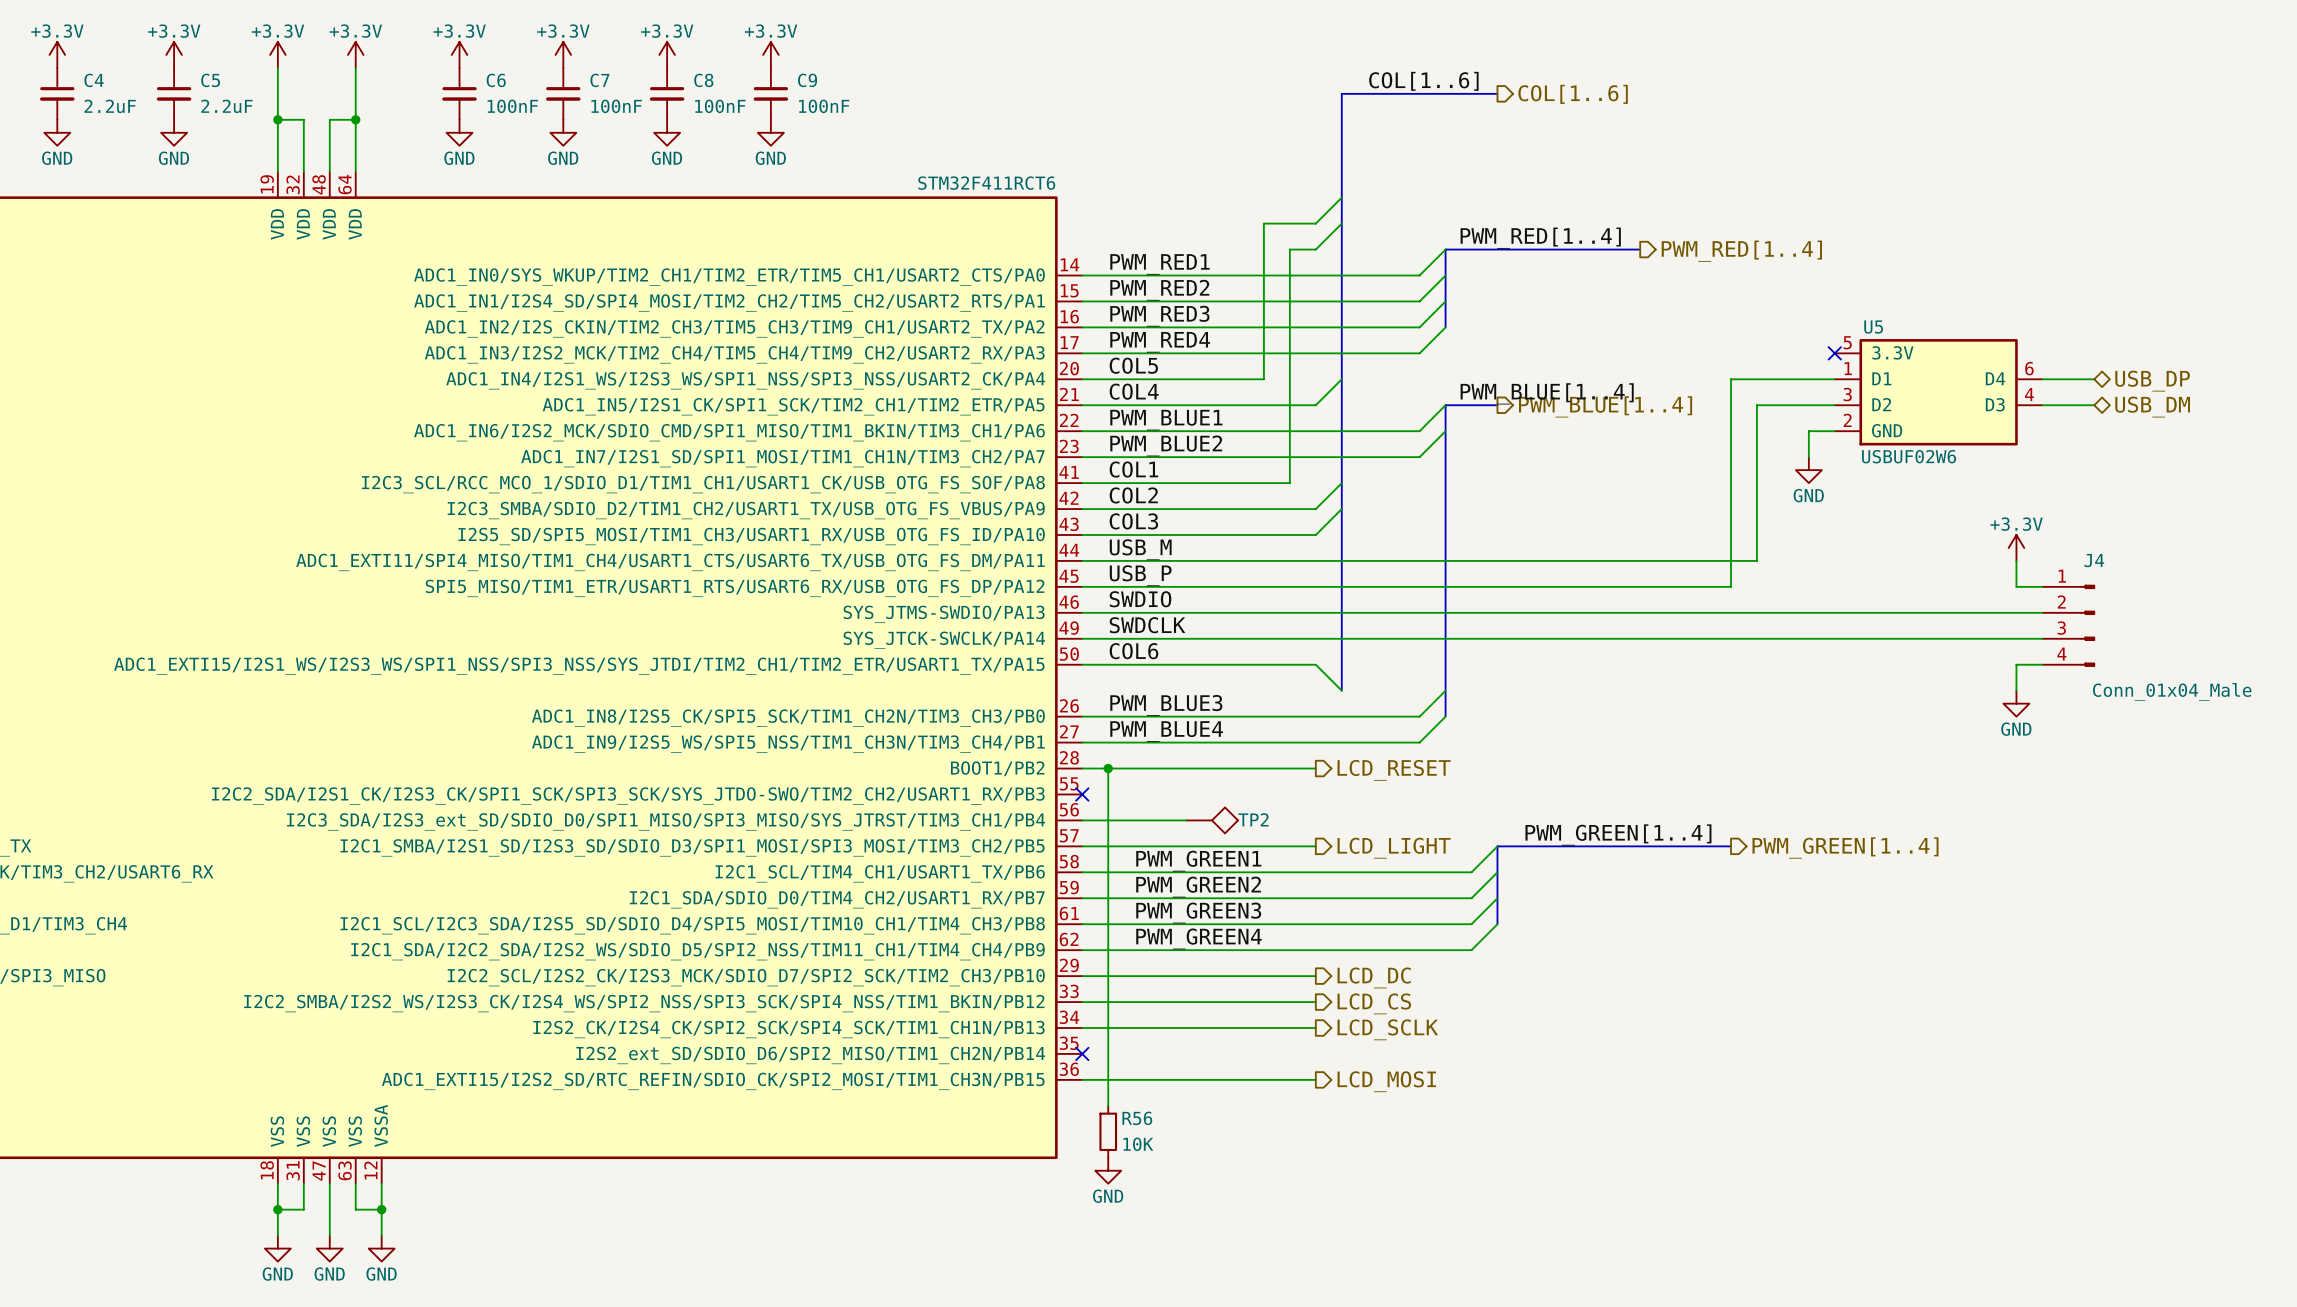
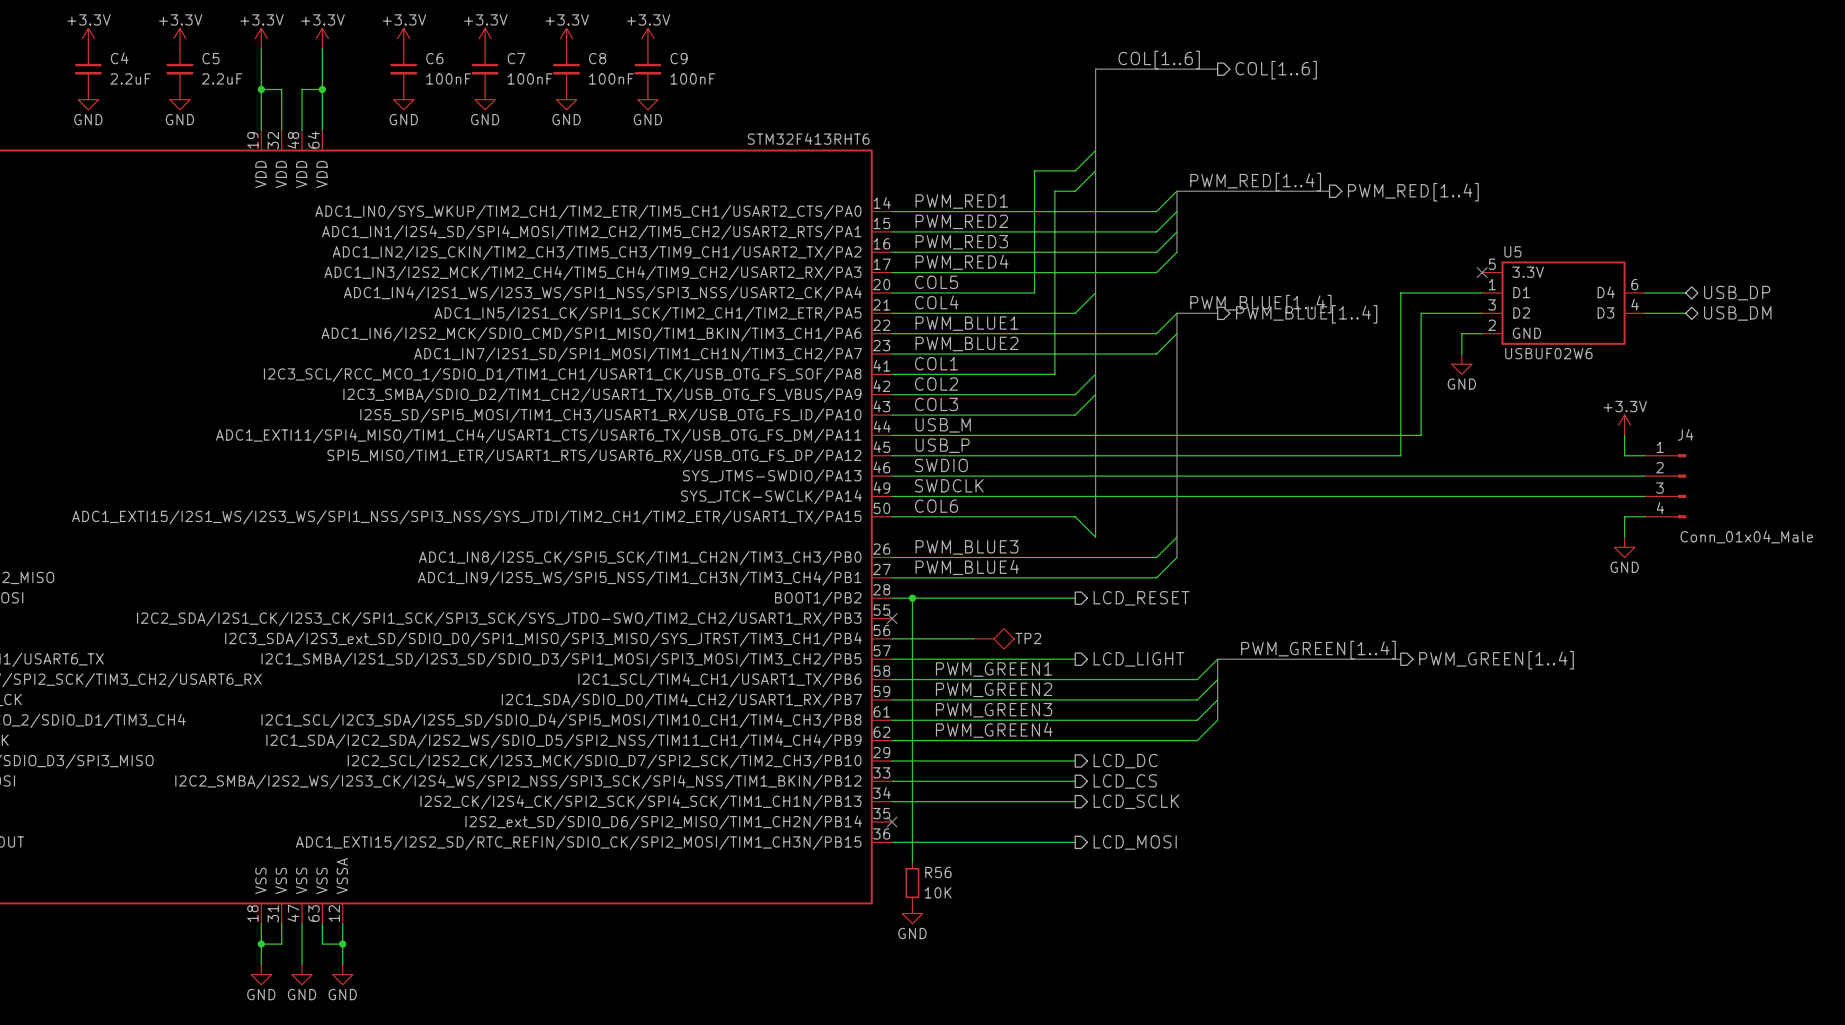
part value: STM32F411RCT6 (986, 183) -> STM32F413RHT6 (808, 138)

